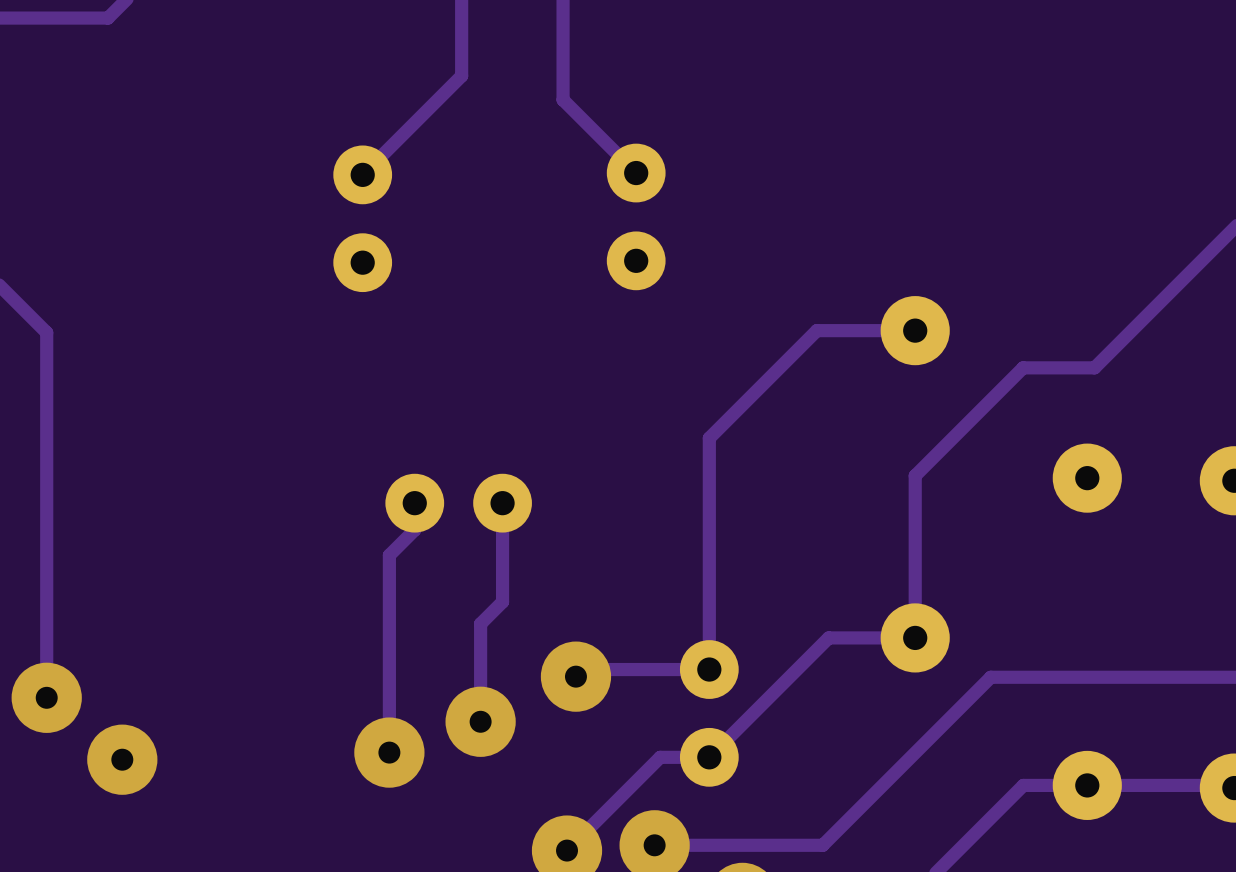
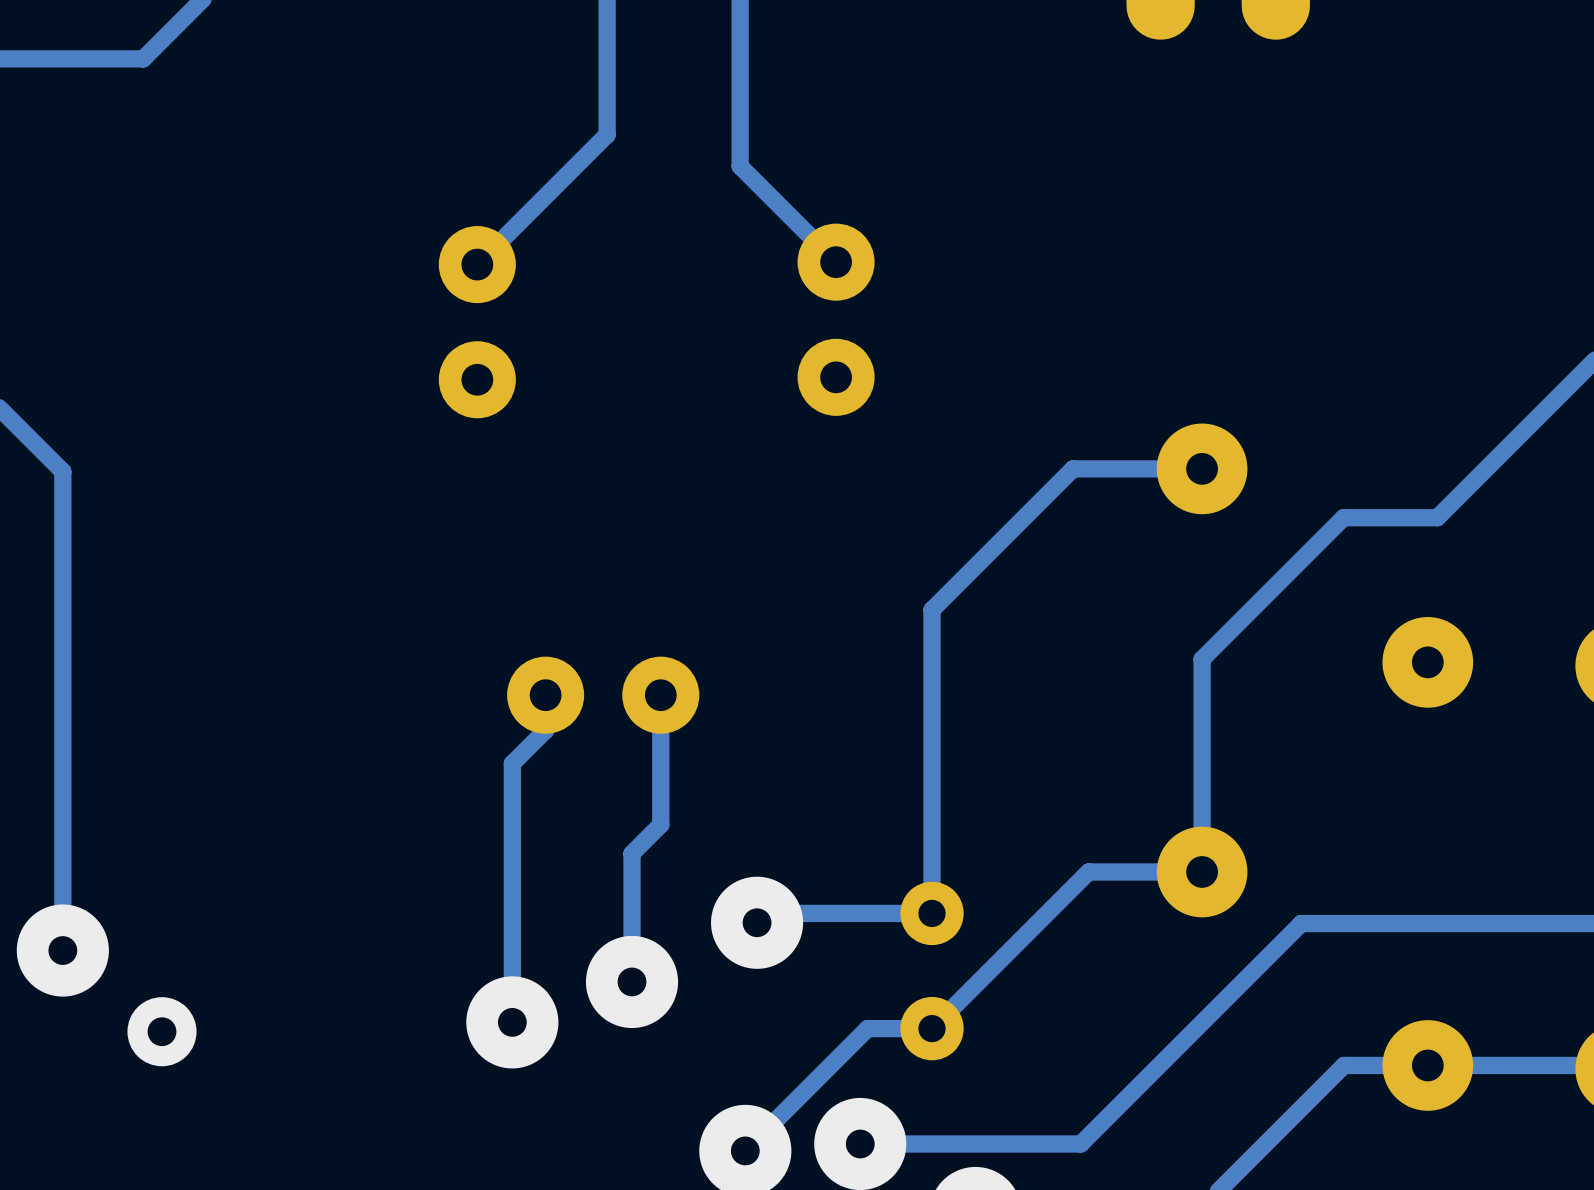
part footprint: [679, 640, 739, 787] -> [900, 881, 964, 1061]
via size: [87, 724, 158, 795] -> [127, 997, 197, 1067]

